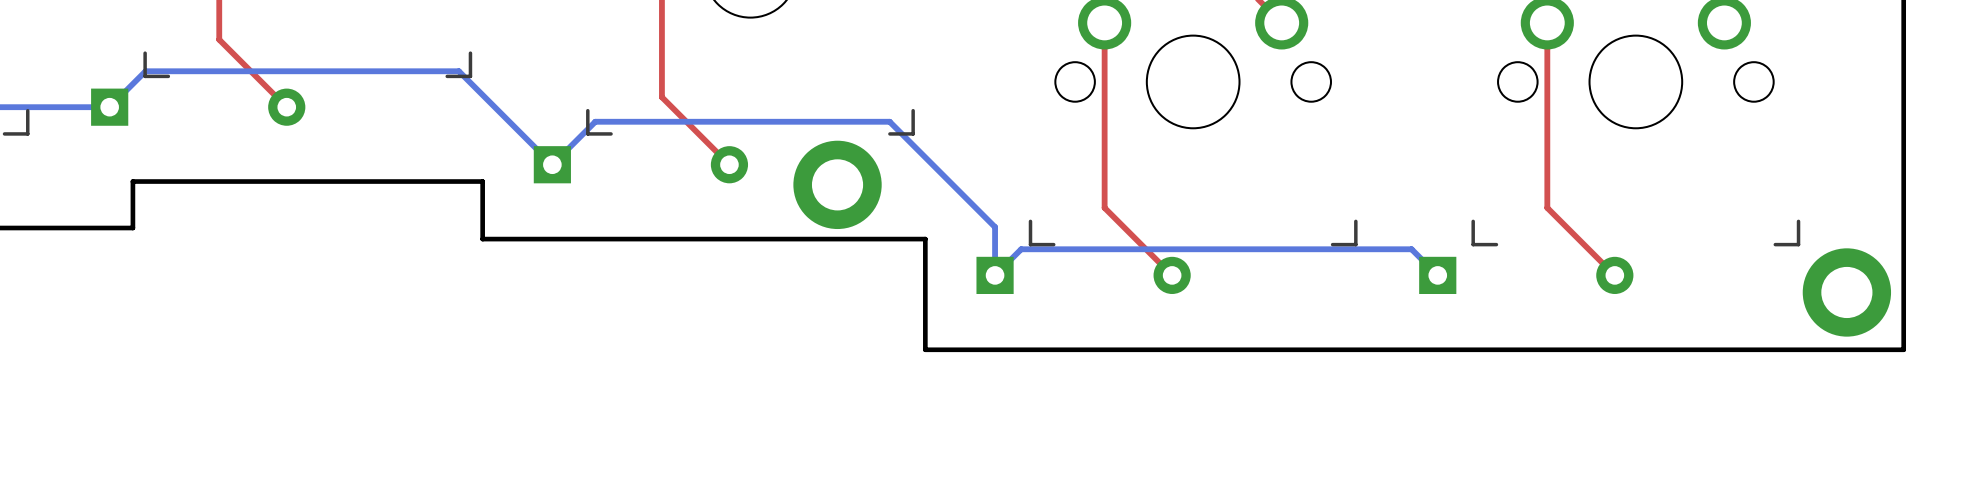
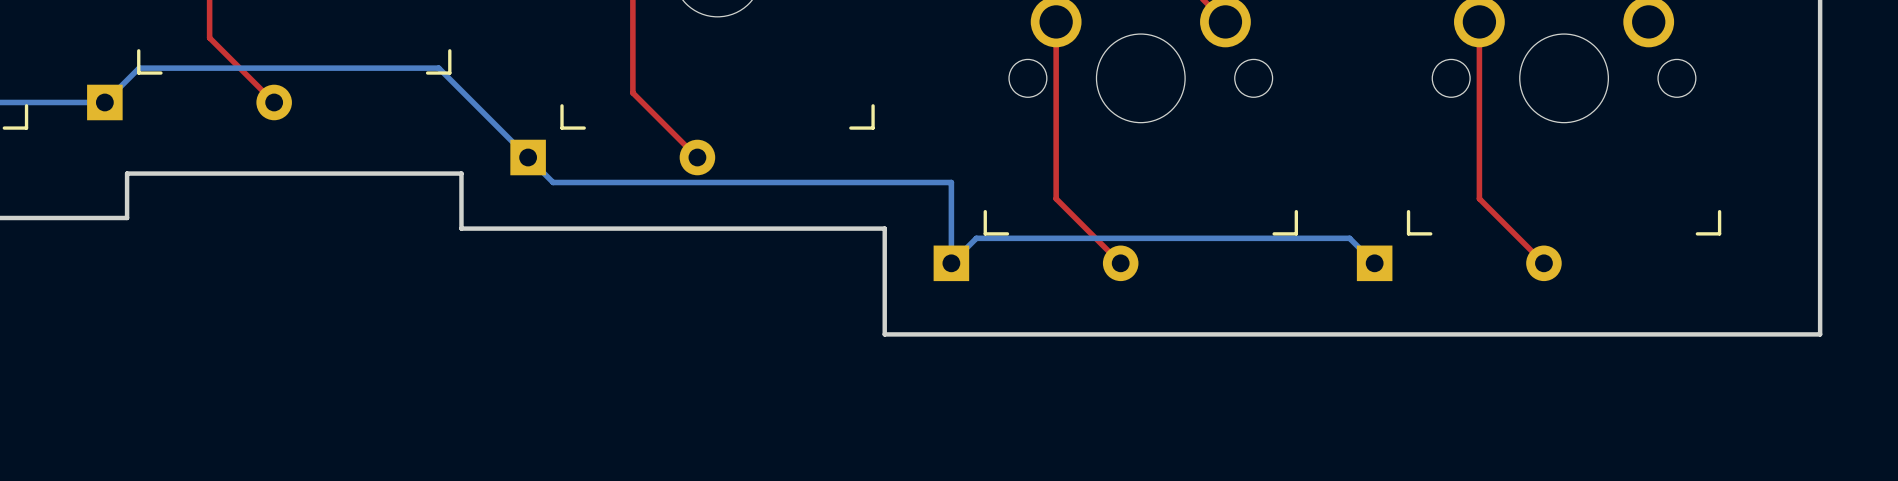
bottom track: (552, 164) (595, 121) (889, 121) (995, 227) -> (528, 157) (553, 182) (951, 182) (951, 217)
part: (837, 184) -> none
part: (1846, 292) -> none

